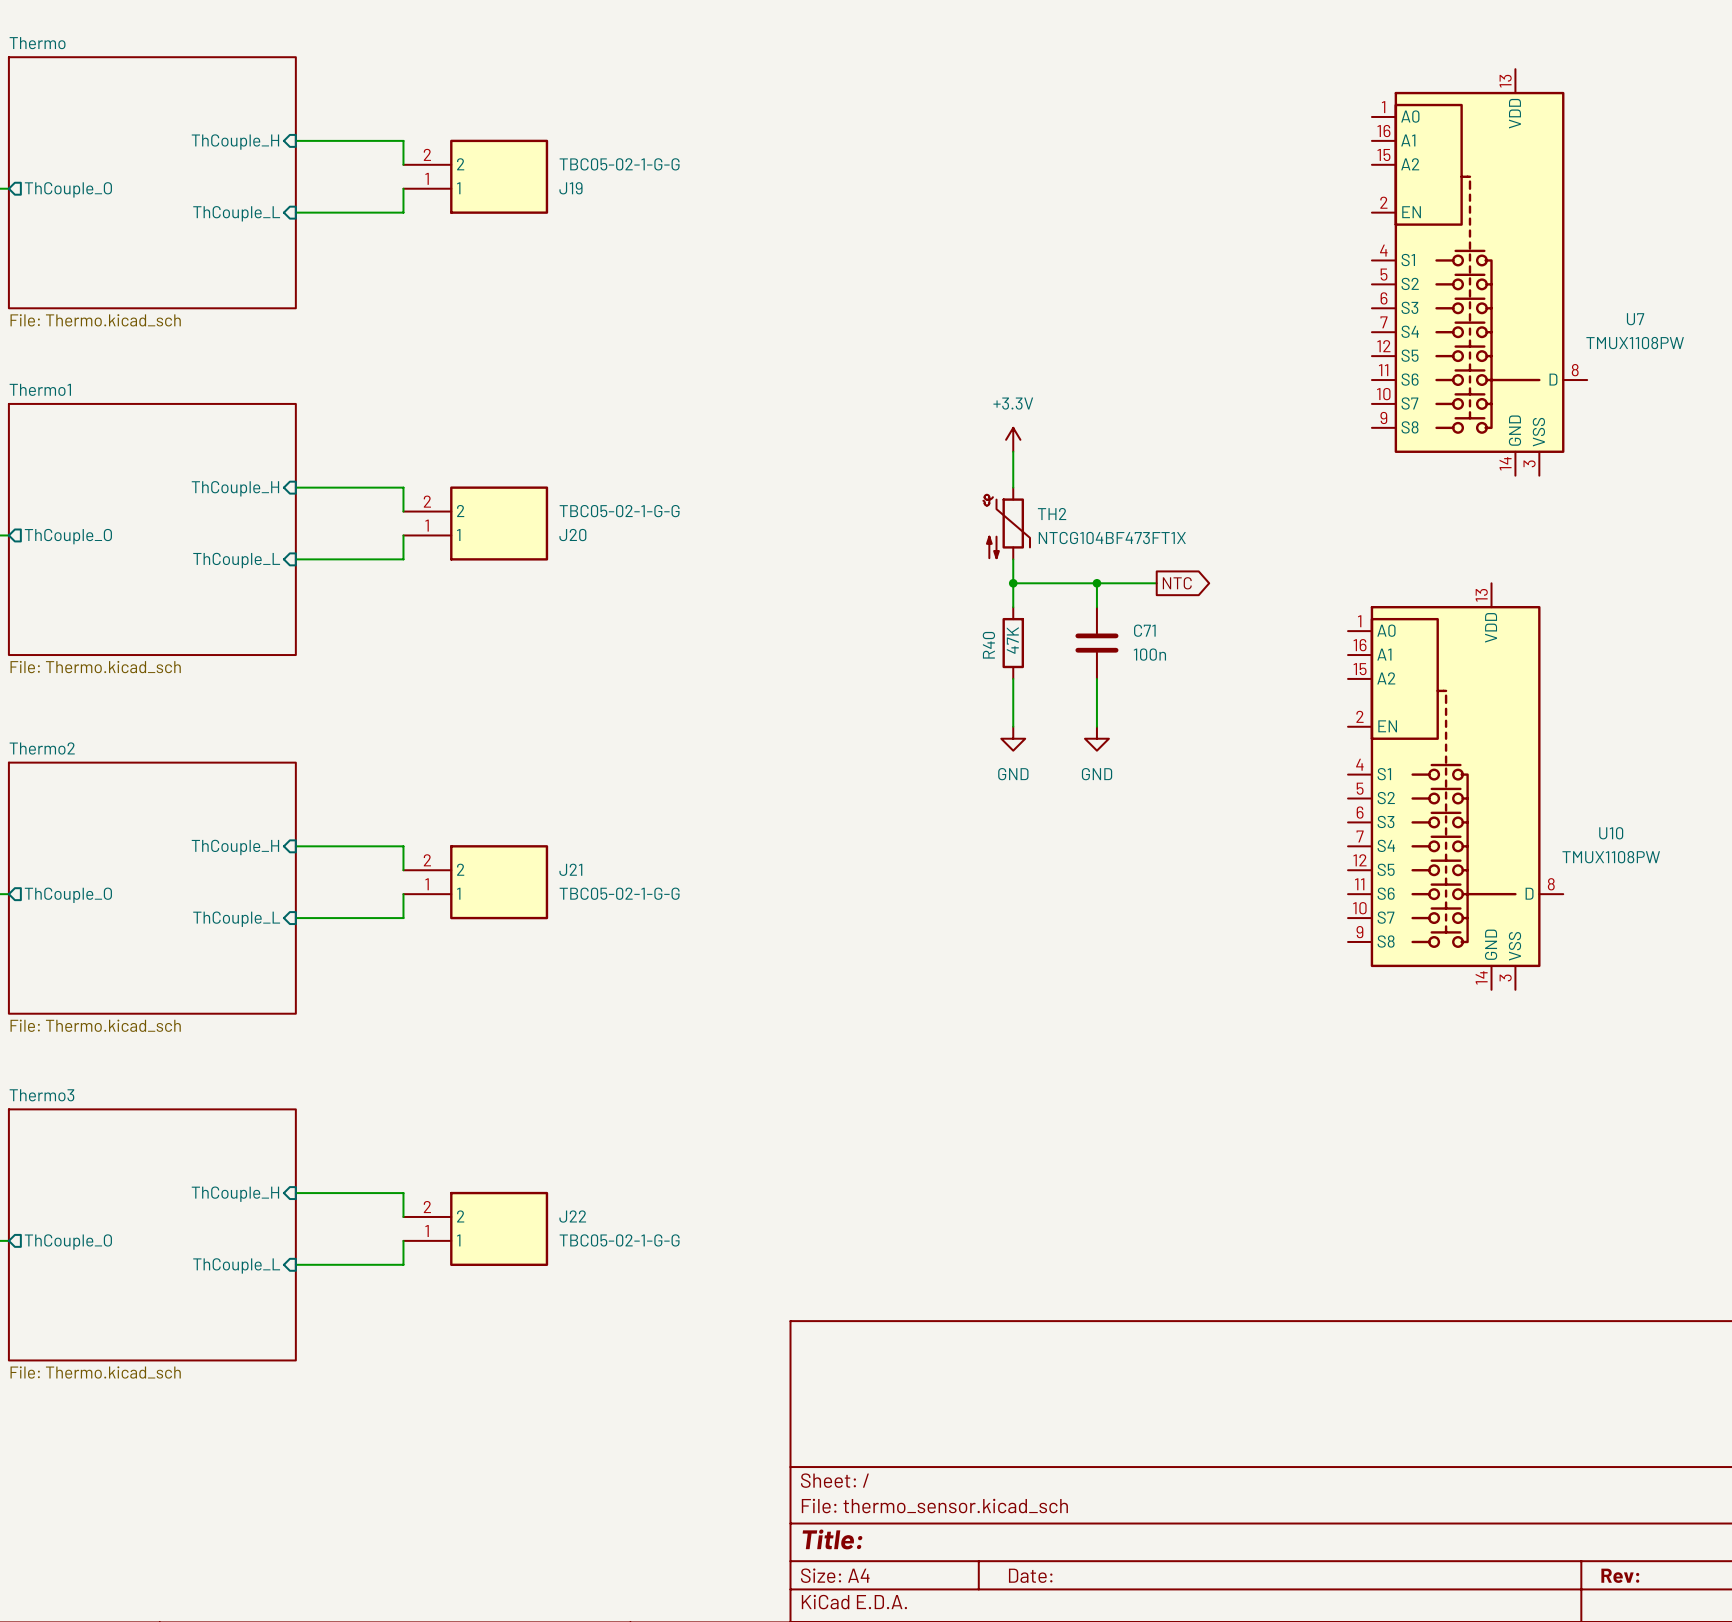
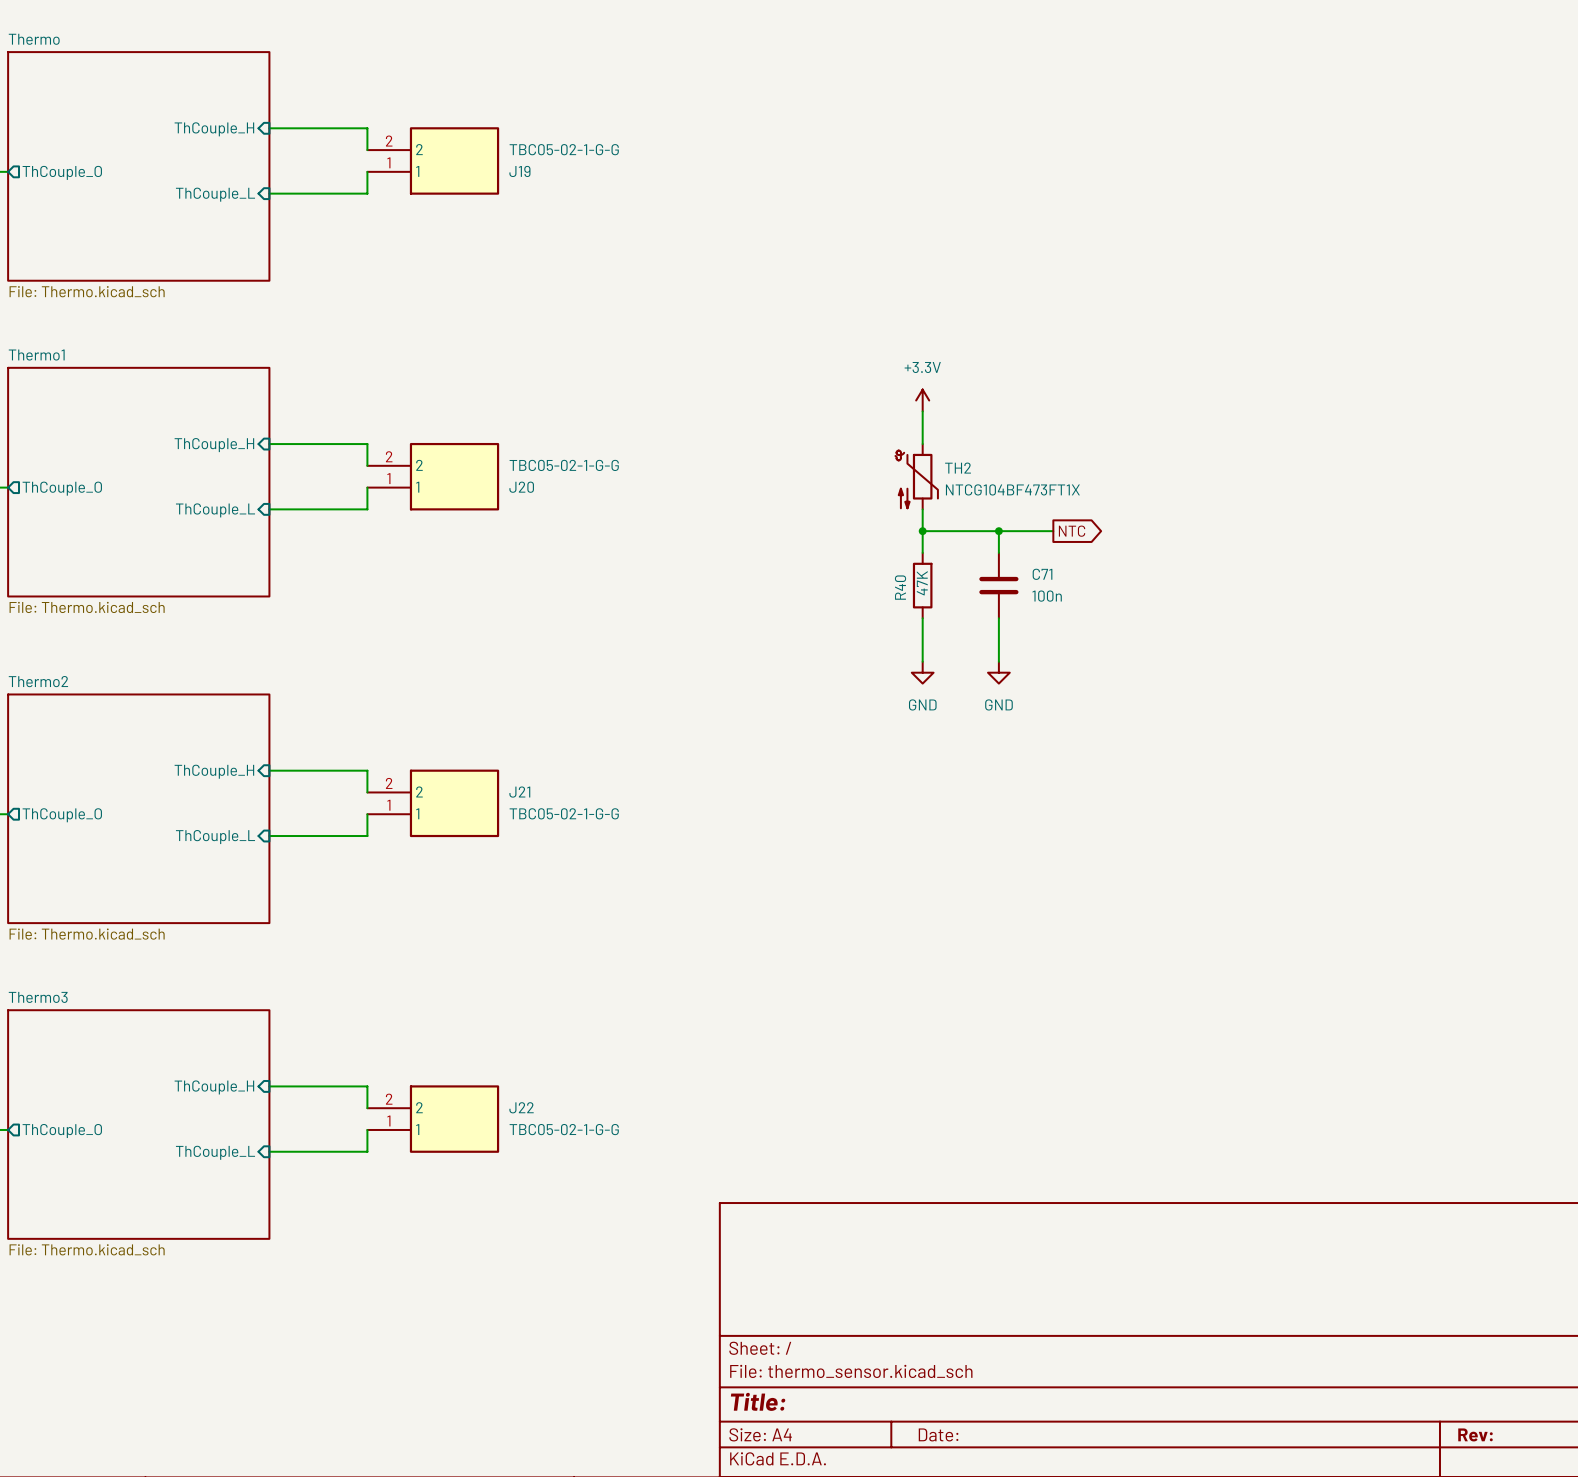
U7: TMUX1108PW (1479, 272) -> none
U10: TMUX1108PW (1455, 786) -> none

